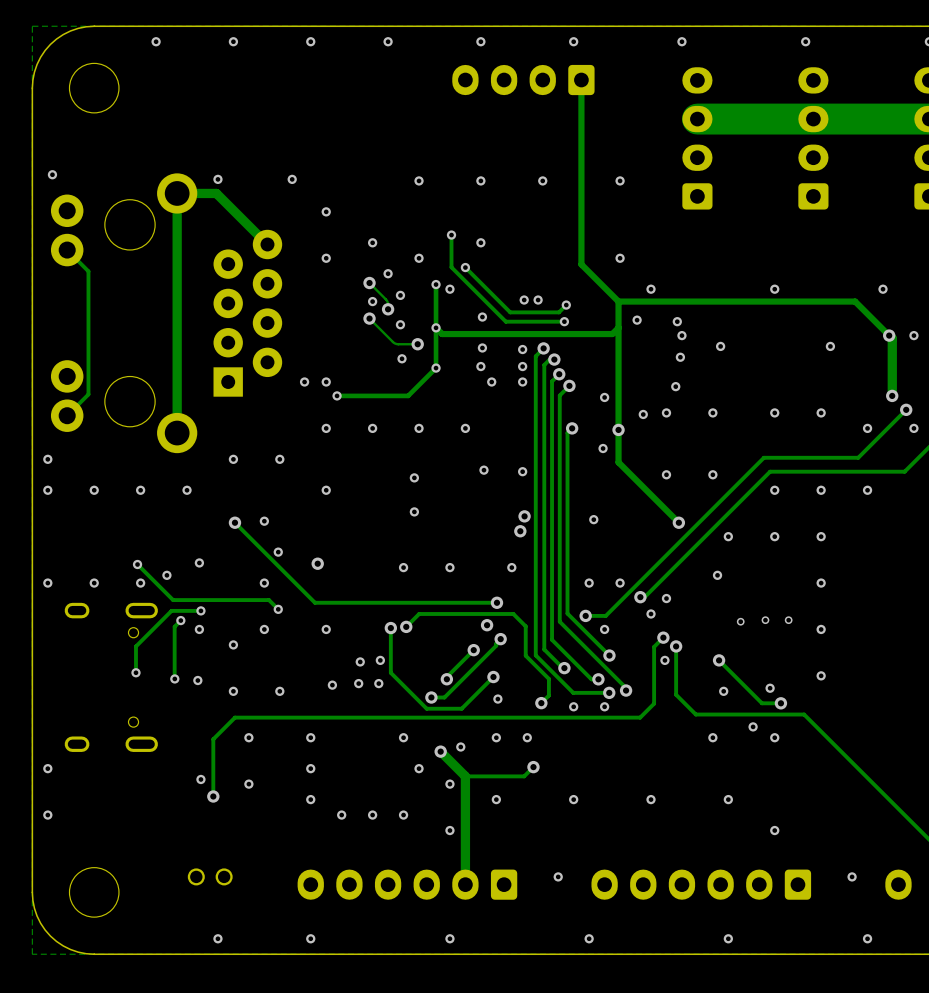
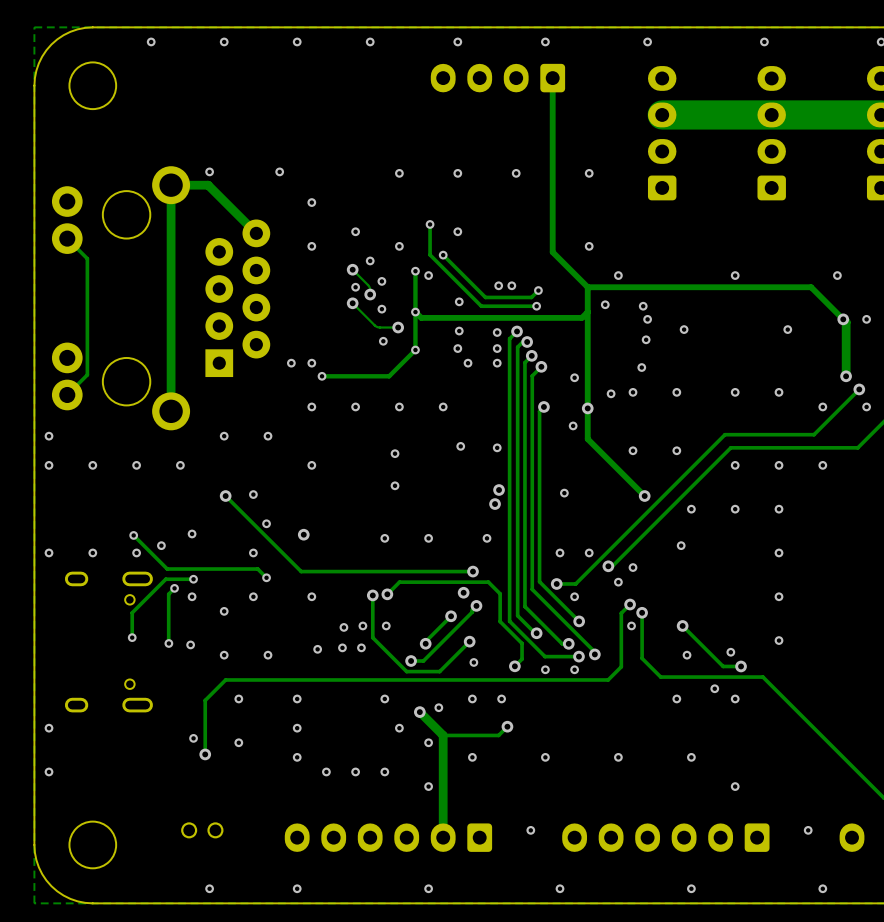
via: (52, 174) -> none
via: (765, 620) -> none
via: (788, 620) -> none
via: (740, 621) -> none
via: none -> (386, 625)

